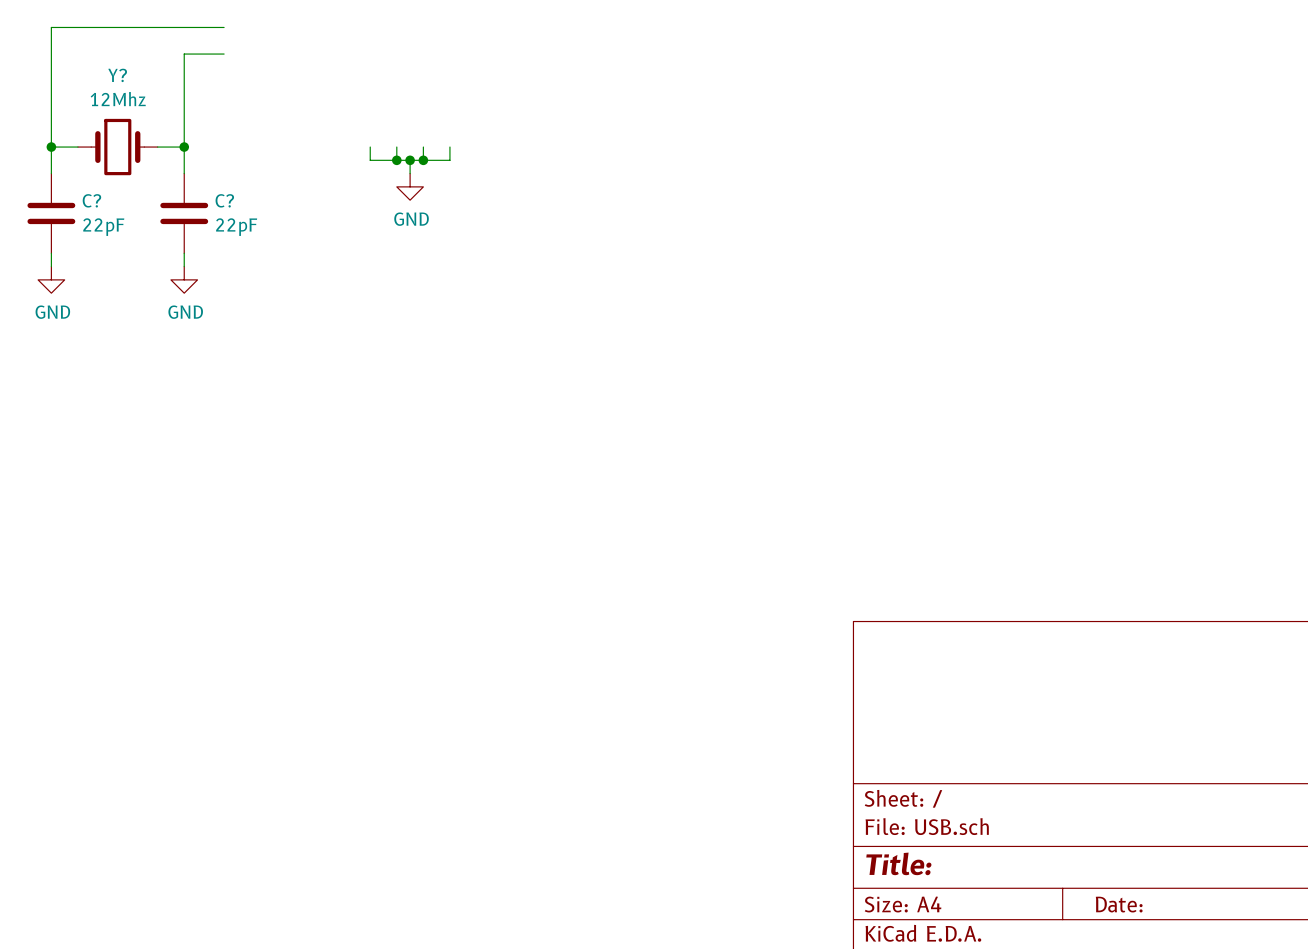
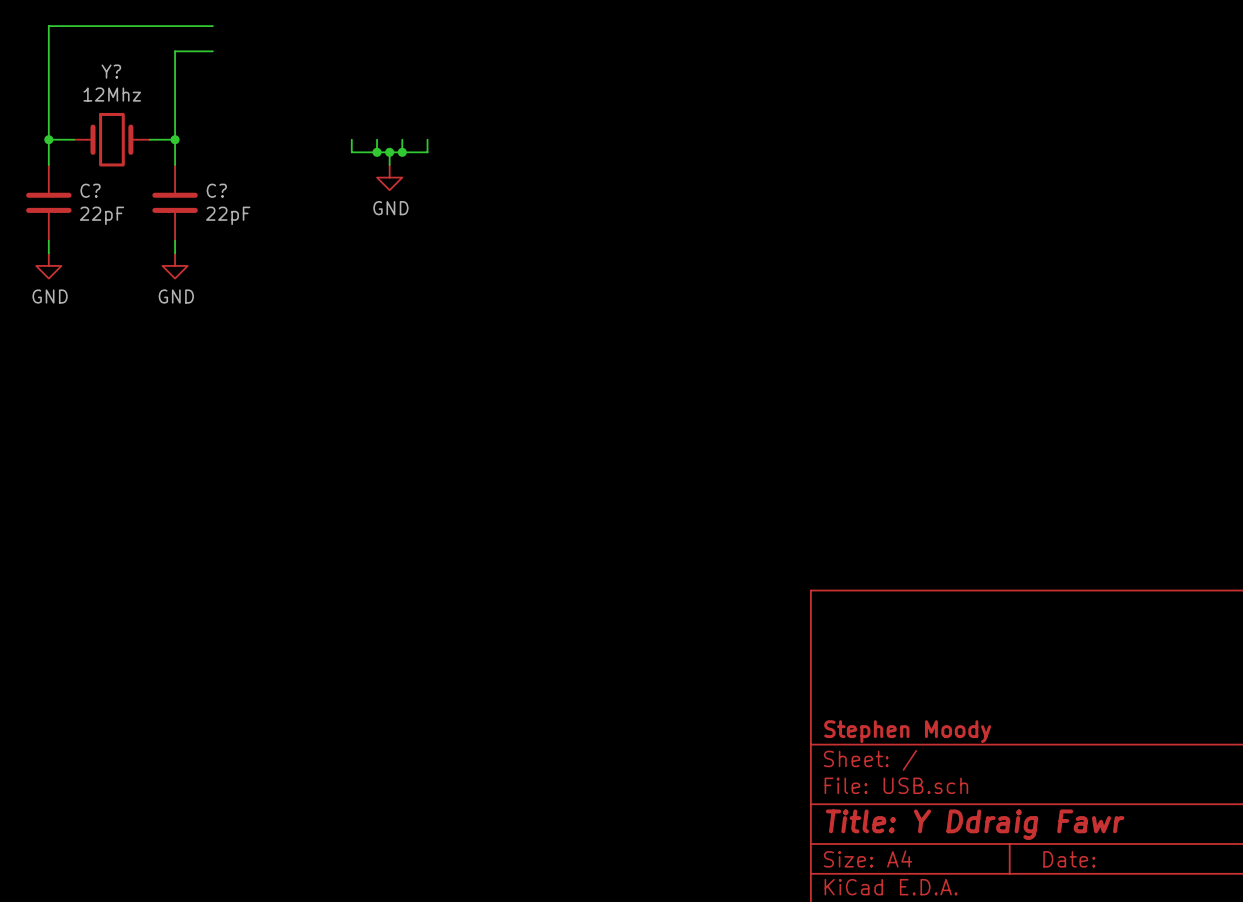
title block: none -> Stephen Moody (907, 731)
title block: Title: (898, 863) -> Title: Y Ddraig Fawr (975, 824)

